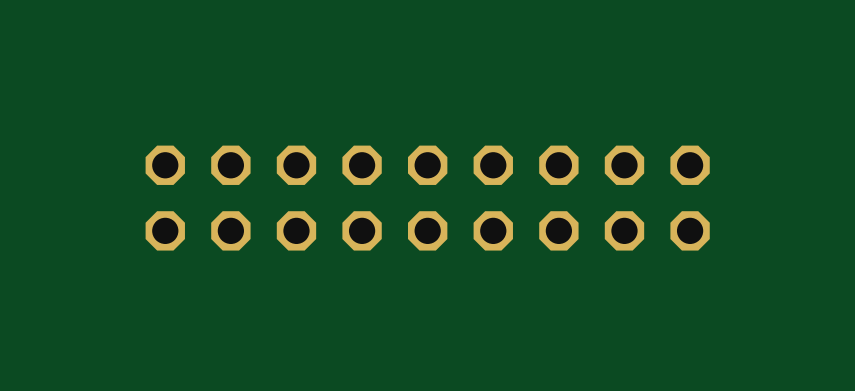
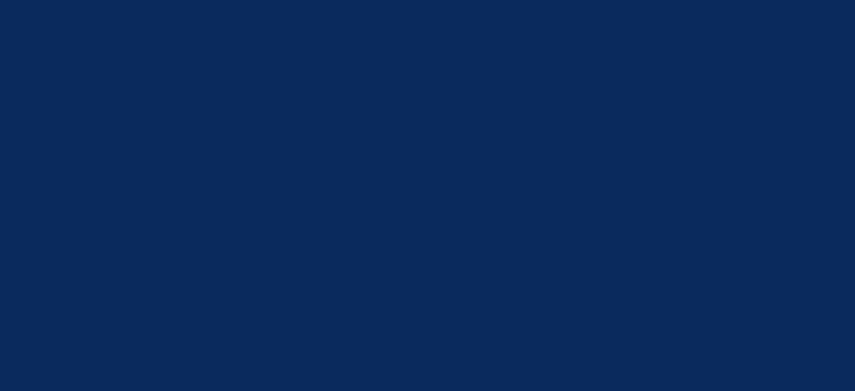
part: (427, 198) -> none

